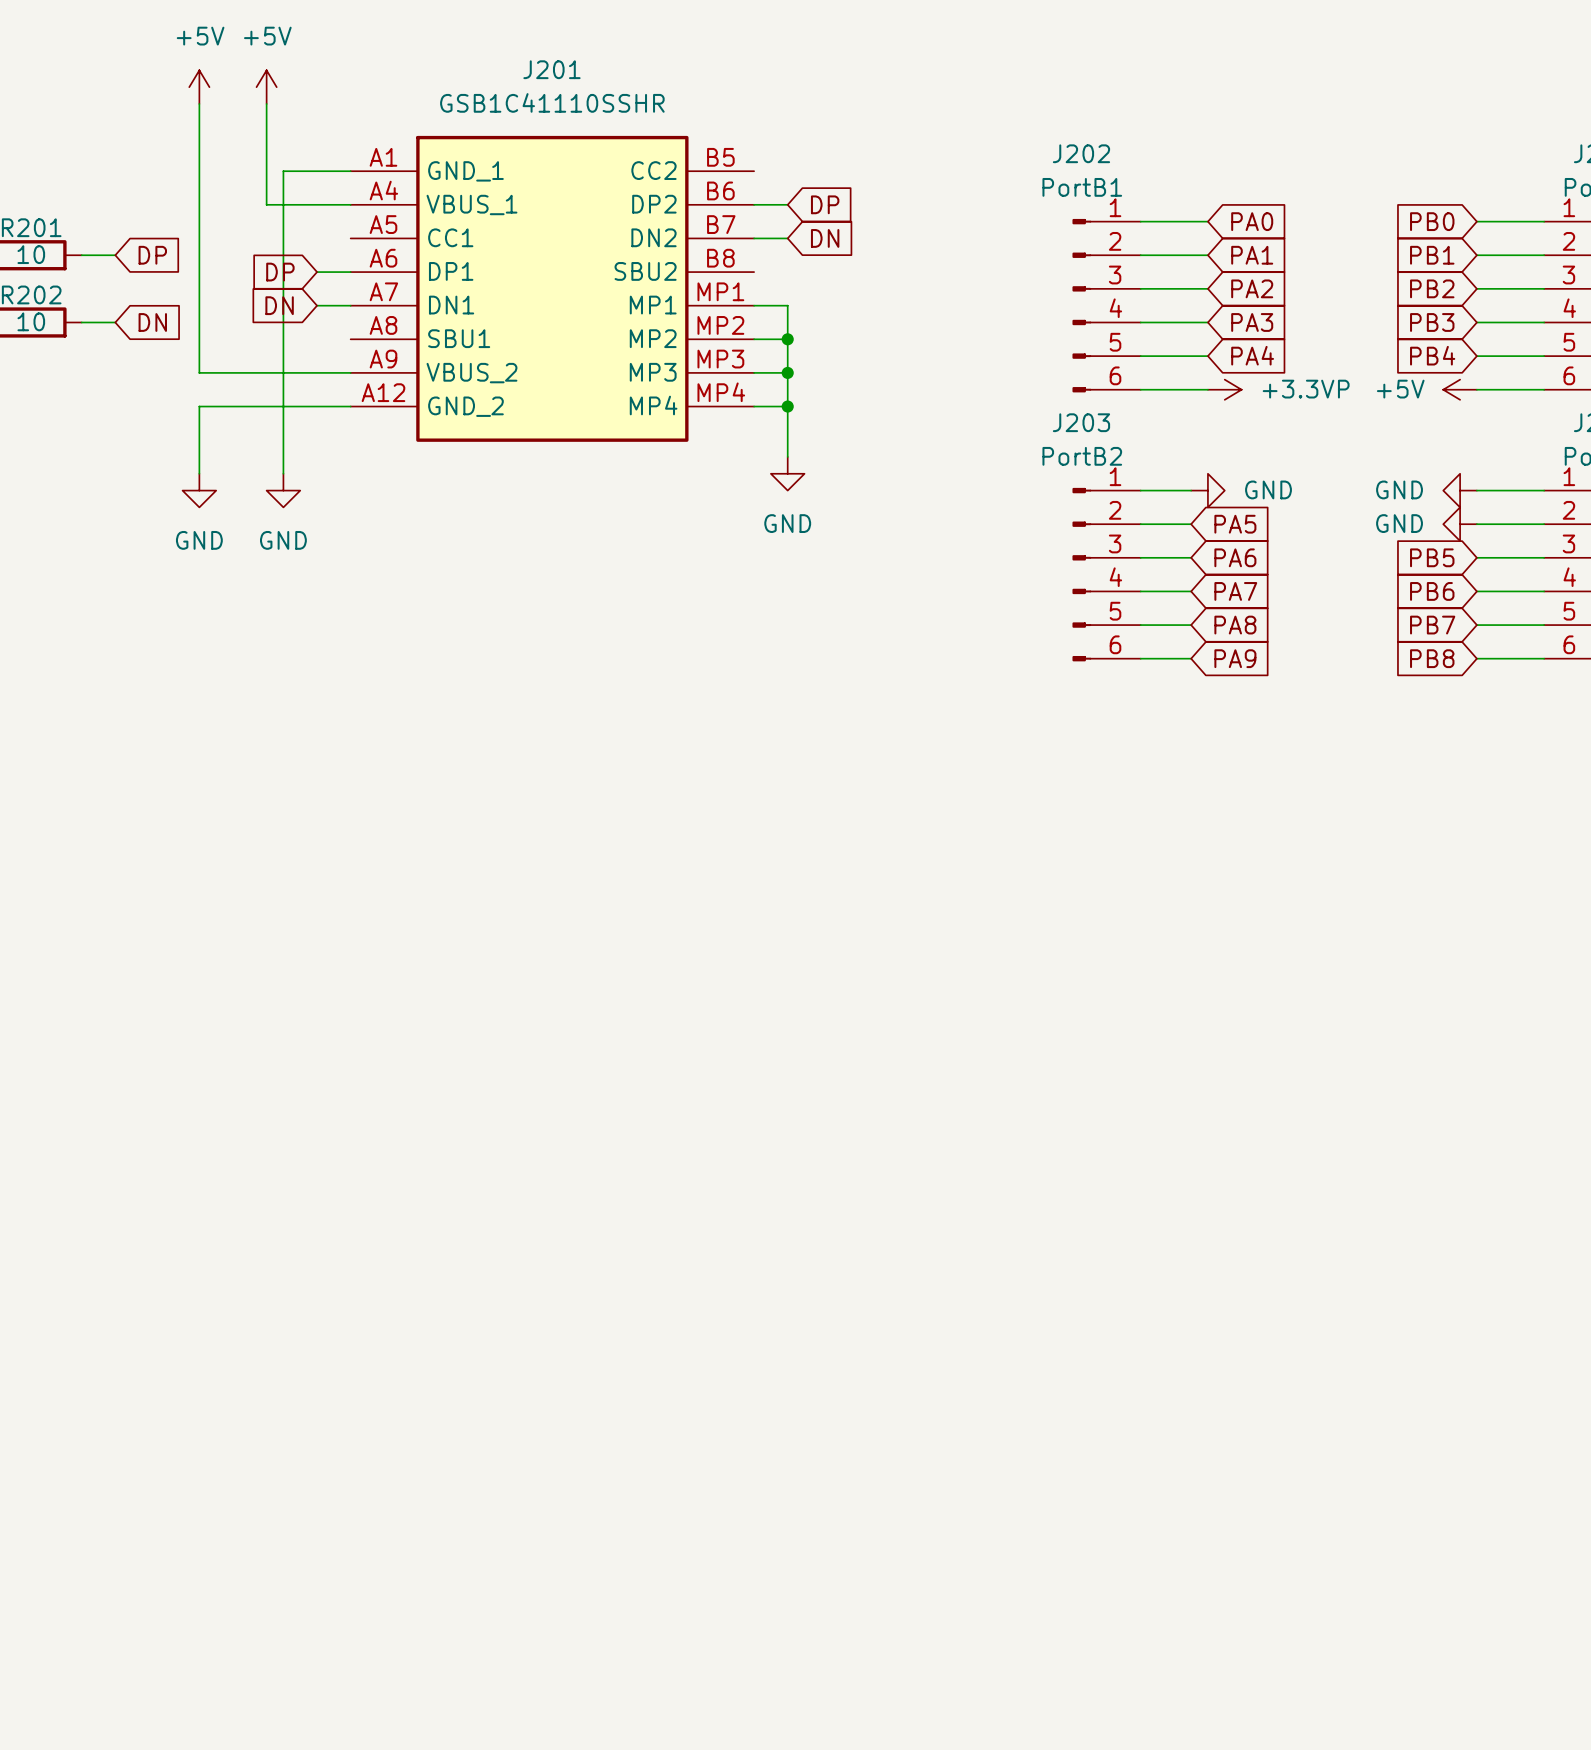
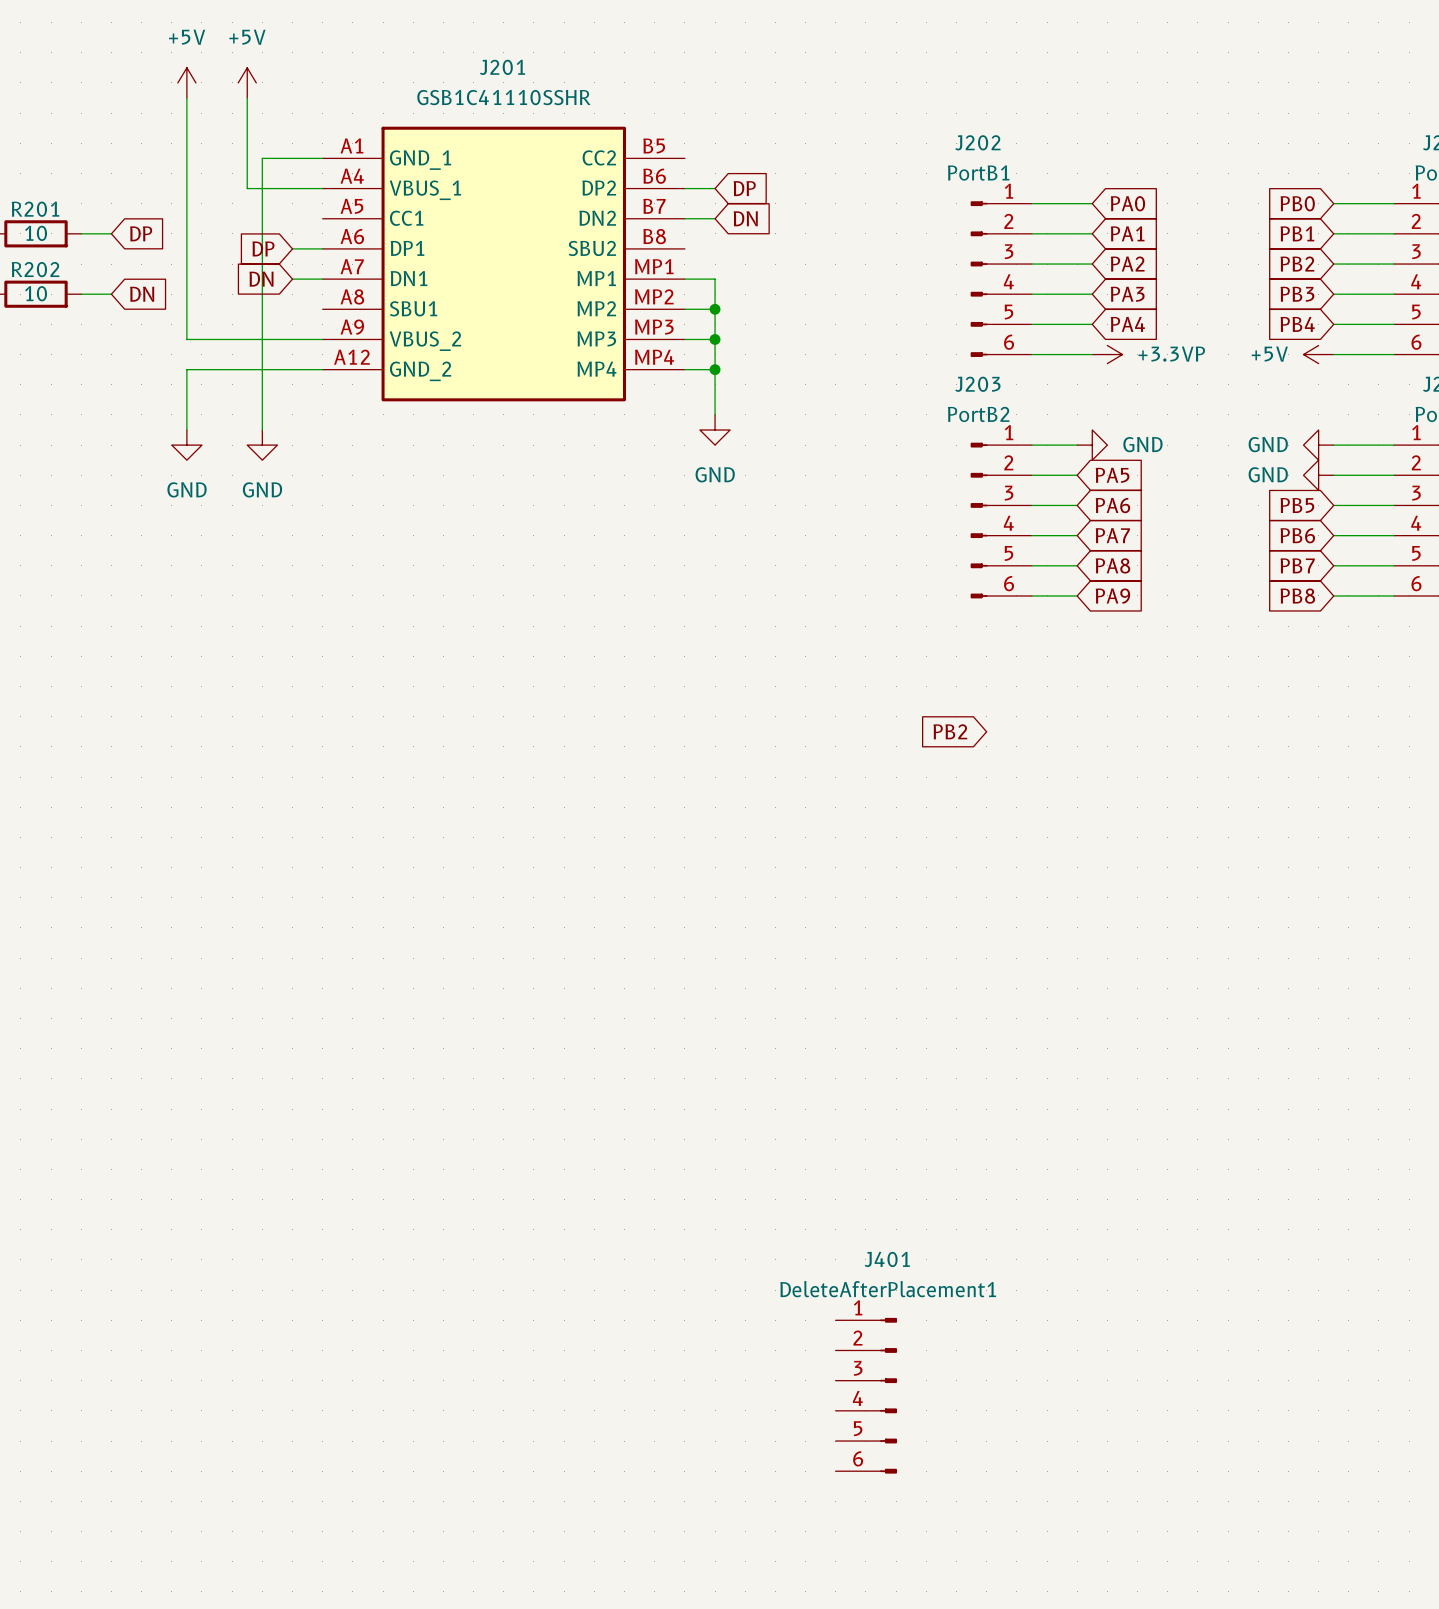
global label: none -> PB2 (950, 731)
J401: none -> DeleteAfterPlacement1 (866, 1395)

